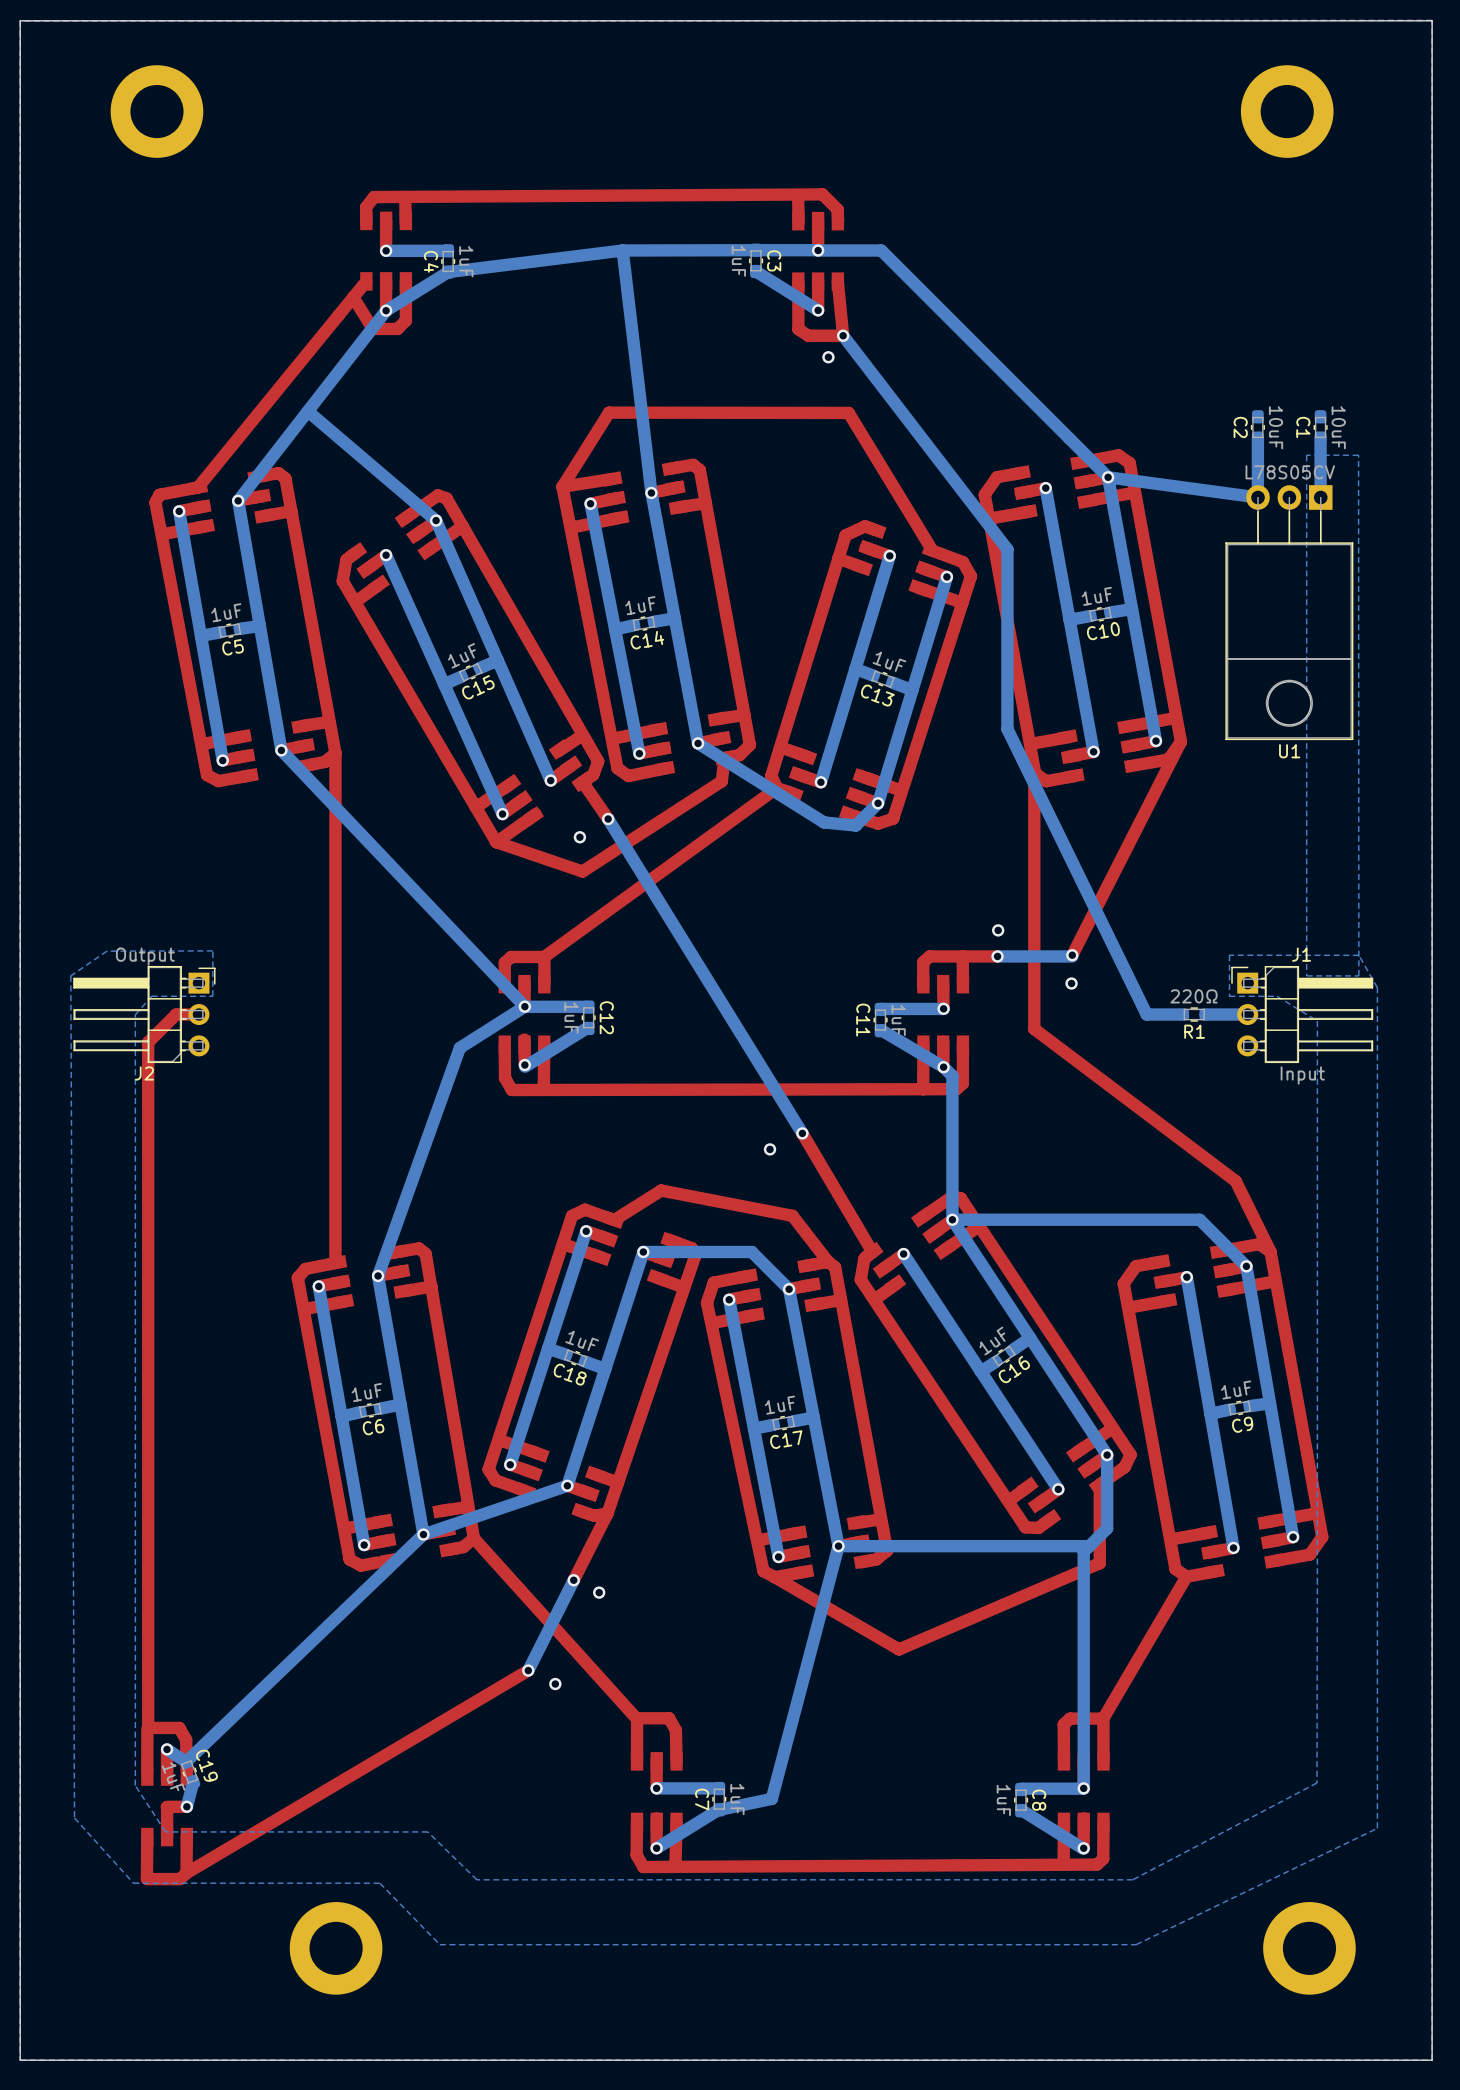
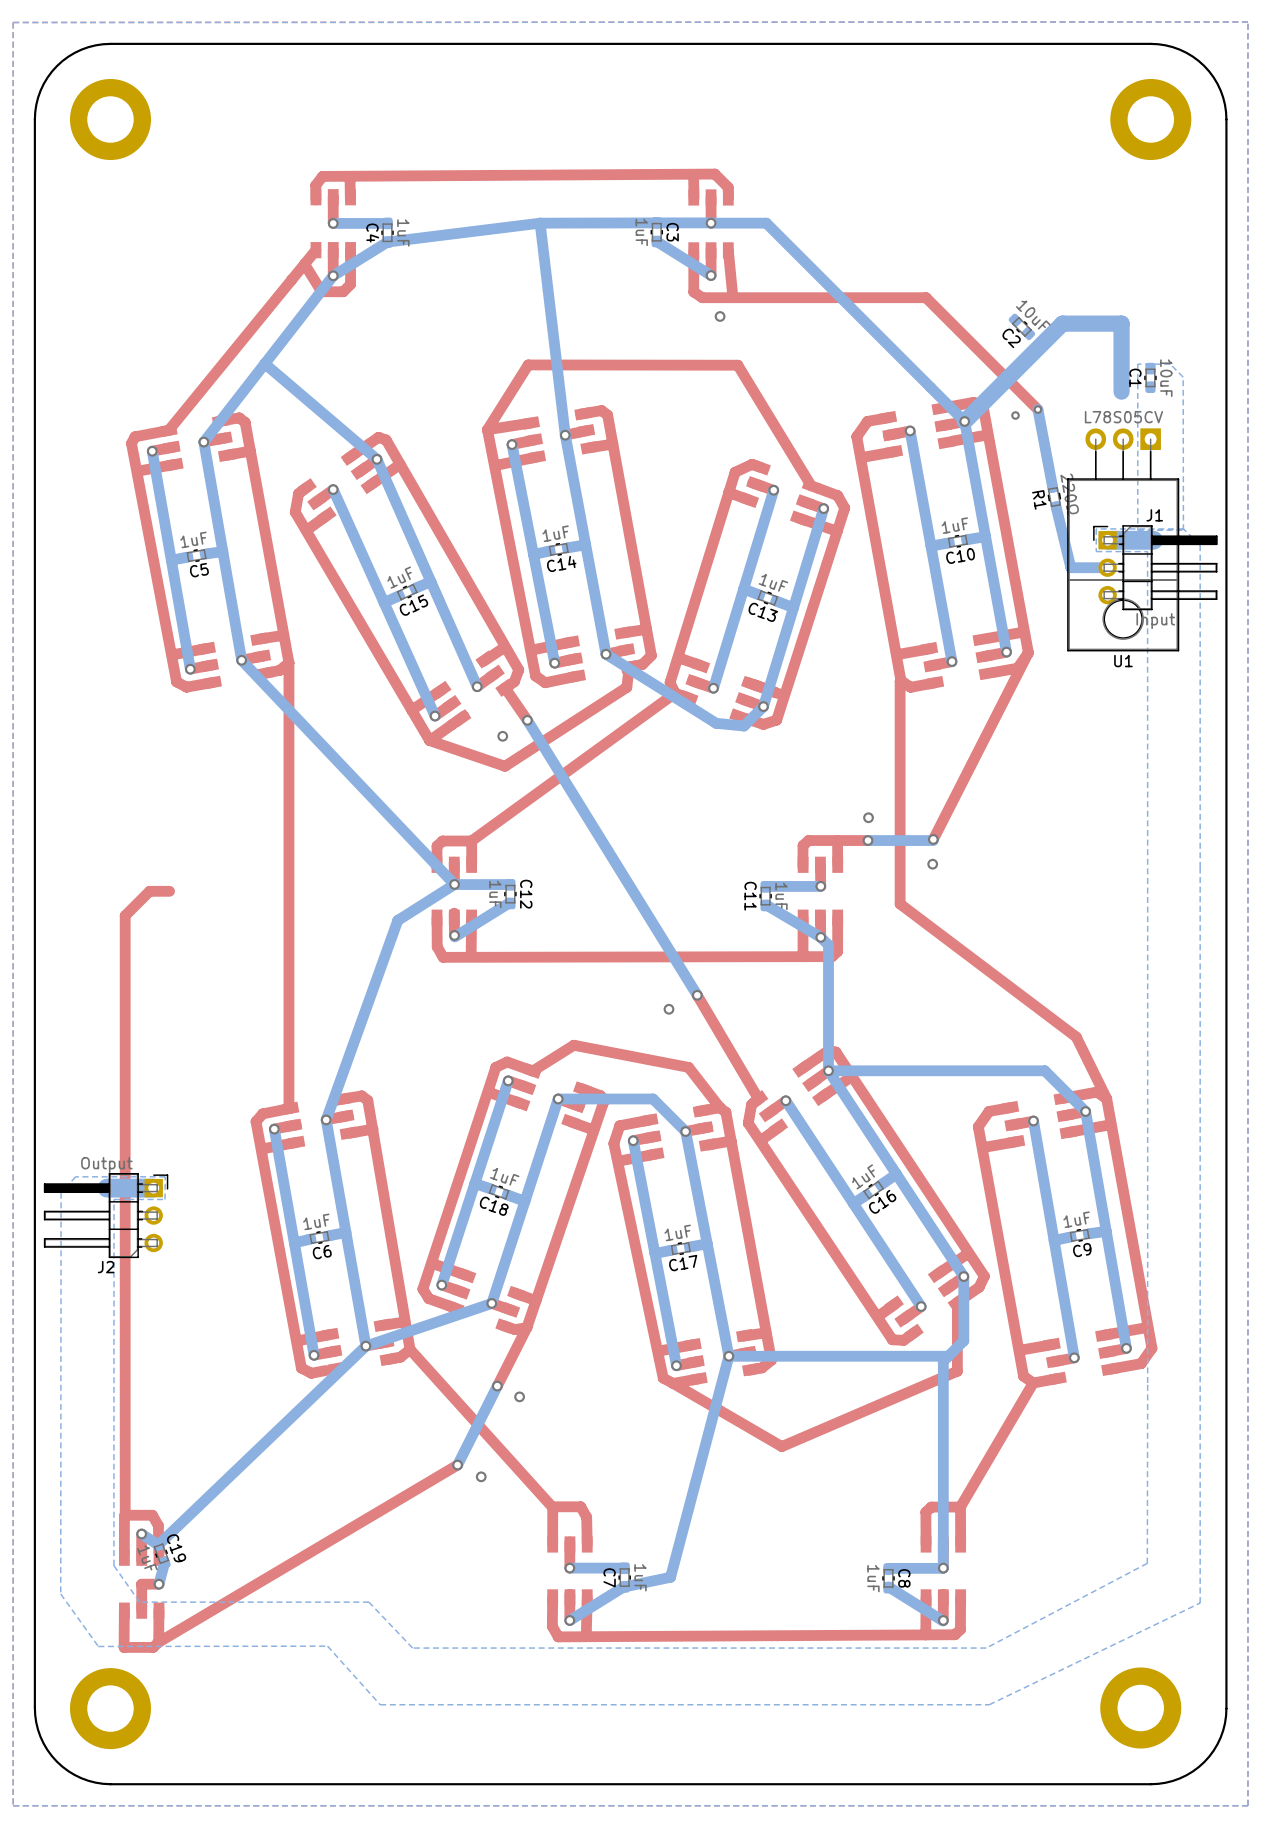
board edge: (1432, 20) (20, 20) (20, 2060) (1432, 2060) (1432, 20) -> (1150, 43) (1179, 49) (1204, 66) (1220, 90) (1226, 119) (1226, 1708) (1223, 1730) (1213, 1750) (1198, 1767) (1186, 1775) (1172, 1780) (1150, 1784) (110, 1784) (88, 1780) (68, 1771) (51, 1755) (43, 1743) (36, 1722) (34, 1707) (34, 119) (38, 97) (47, 77) (62, 61) (74, 52) (88, 47) (110, 43) (1150, 43)
part position: (156, 111) -> (110, 119)
part position: (1287, 111) -> (1150, 119)
top track: none -> (732, 297) (926, 297) (1037, 409)
bottom track: (843, 335) (1007, 549) (1007, 729) (1146, 1014) (1183, 1014) -> none
via: (843, 335) -> none
bottom zone outline: none -> (1170, 364) (1183, 377) (1183, 530) (1137, 530) (1137, 364) (1170, 364)
C2 rotation: 0° (1257, 427) -> 45° counterclockwise (1021, 326)
C2 position: (1257, 427) -> (1021, 326)
bottom track: (1257, 438) (1257, 497) (1108, 477) -> (1121, 391) (1121, 323) (1062, 323) (964, 421)
bottom track: (1320, 438) (1320, 497) -> none
bottom zone outline: (1358, 455) (1358, 975) (1306, 975) (1306, 455) (1358, 455) -> none
bottom track: none -> (1037, 409) (1052, 487)
via: none -> (1037, 409)
via: none -> (1015, 415)
bottom track: none -> (1056, 506) (1070, 567) (1107, 567)
bottom track: none -> (1153, 540) (1107, 540)
bottom zone outline: (1377, 987) (1358, 955) (1229, 955) (1229, 996) (1277, 996) (1317, 1021) -> (1200, 867) (1200, 545) (1183, 528) (1096, 528) (1096, 551) (1147, 551) (1147, 897)
J2 position: (144, 1014) -> (106, 1215)
R1 rotation: 0° (1194, 1014) -> 80° clockwise (1054, 497)
R1 position: (1194, 1014) -> (1054, 497)
bottom track: (1247, 1014) (1205, 1014) -> none
J1 position: (1302, 1014) -> (1155, 567)
bottom track: none -> (153, 1188) (107, 1188)
bottom zone outline: (476, 1879) (427, 1831) (165, 1831) (135, 1785) (135, 1014) (151, 996) (212, 996) (212, 950) (106, 951) (70, 975) (74, 1818) (133, 1883) (379, 1883) (439, 1944) -> (412, 1648) (368, 1602) (139, 1602) (113, 1565) (114, 1199) (164, 1199) (165, 1176) (75, 1176) (61, 1192) (60, 1594) (98, 1646) (327, 1646) (380, 1704)
part position: (336, 1948) -> (110, 1708)

